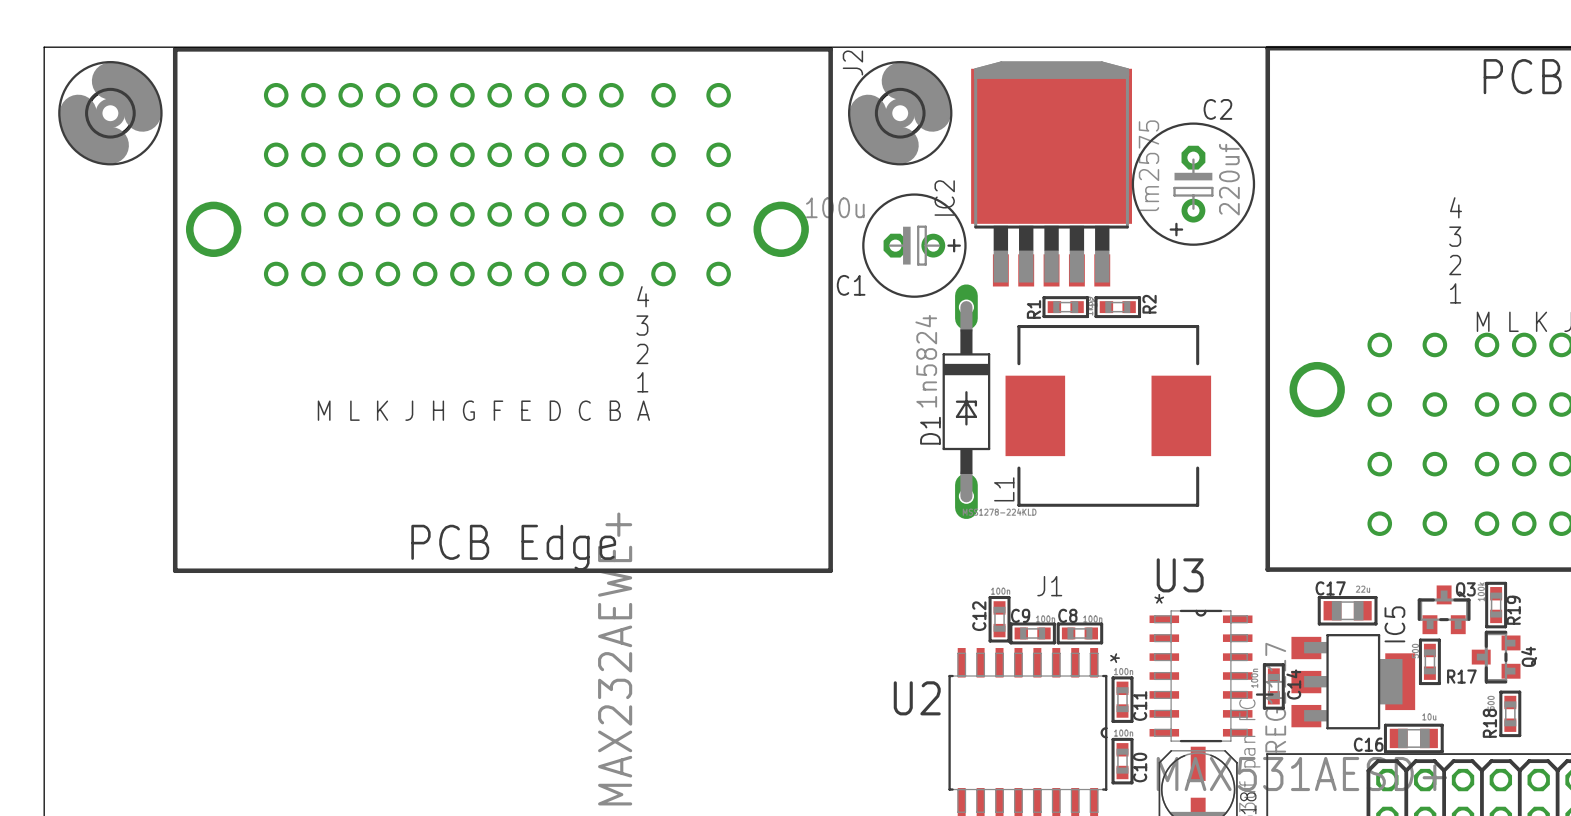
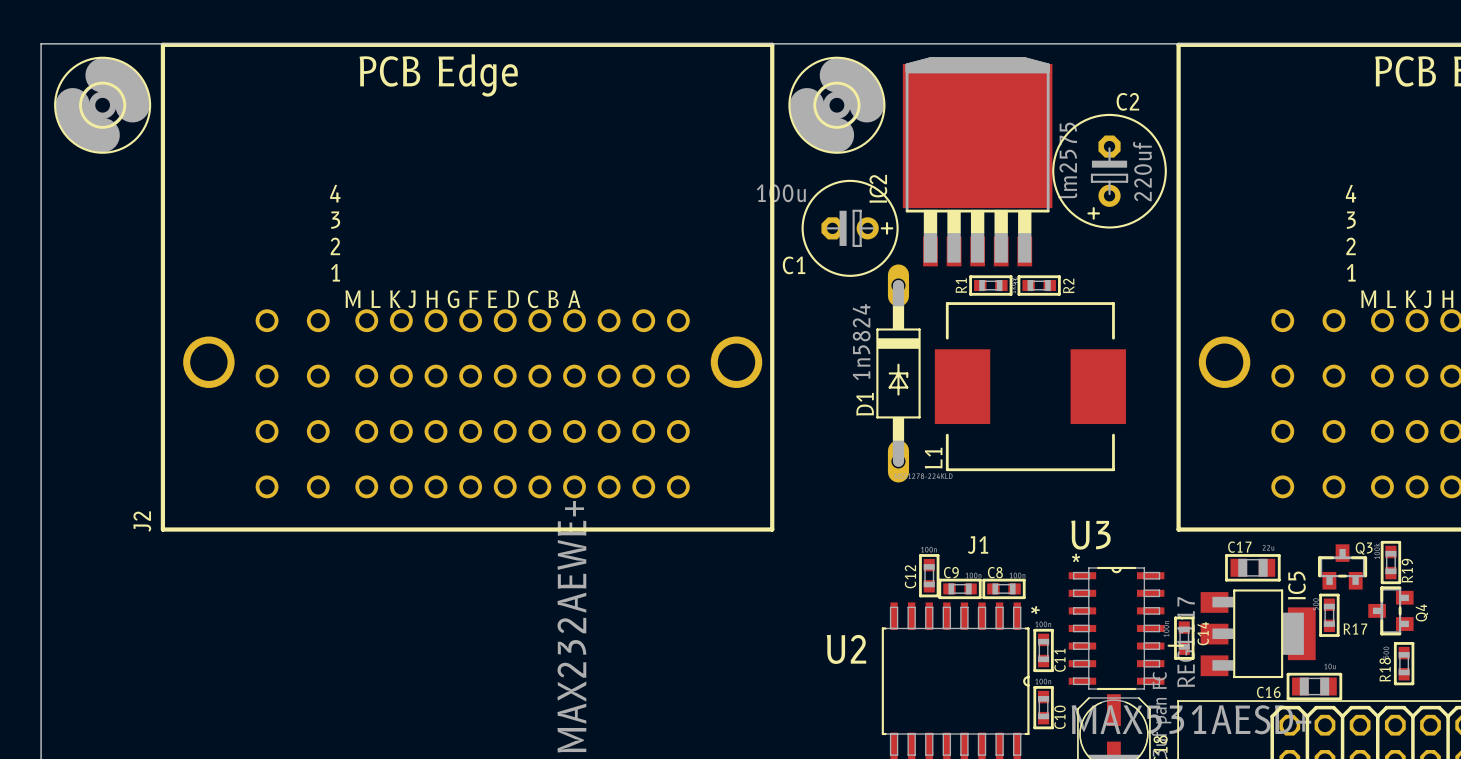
J2 footprint: [172, 47, 833, 574] -> [160, 42, 775, 532]
J2 name position: J2 (852, 62) -> J2 (142, 521)

